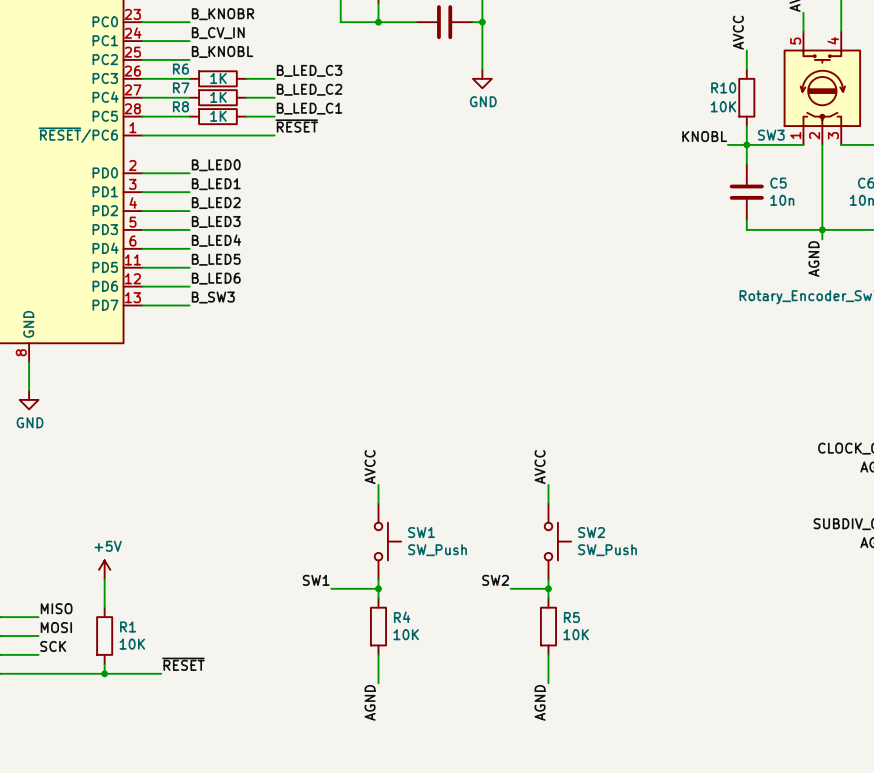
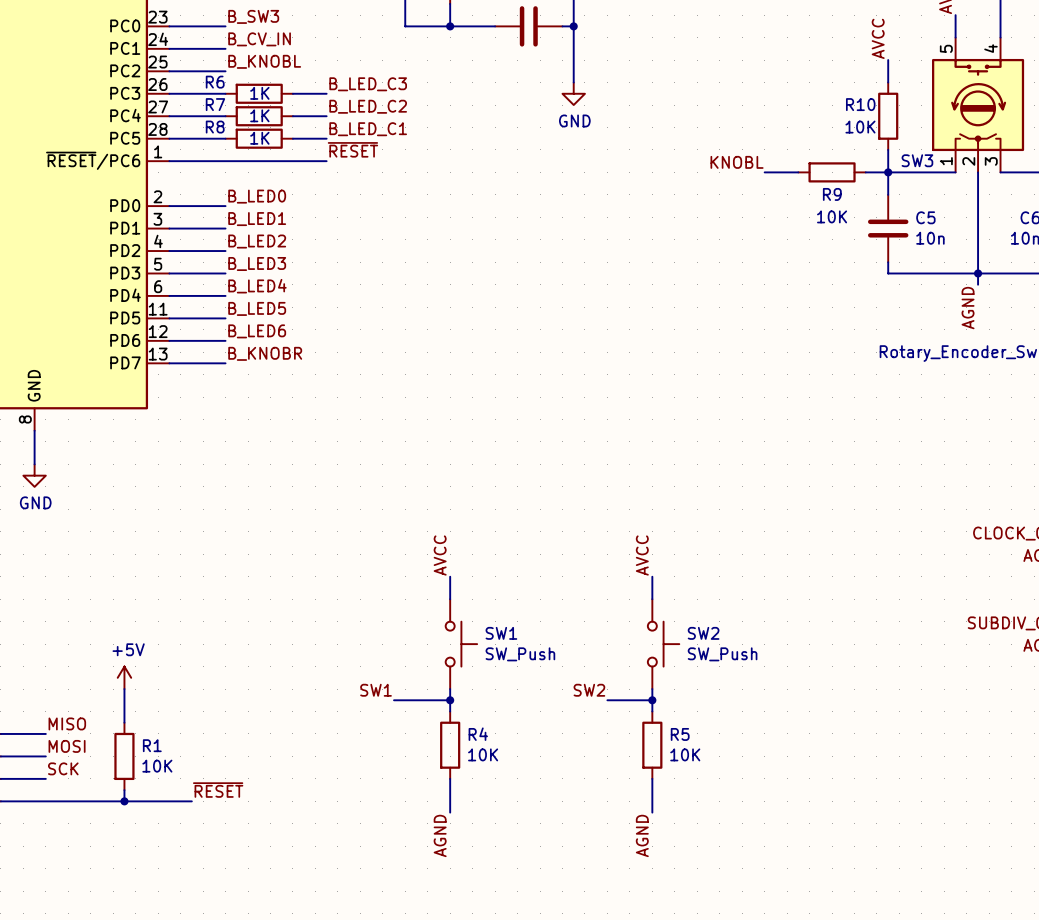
label: B_KNOBR (222, 14) -> B_SW3 (253, 16)
label position: KNOBL (704, 136) -> KNOBL (737, 162)
wire: none -> (764, 172) (798, 172)
R9: none -> 10K (832, 172)
label: B_SW3 (213, 297) -> B_KNOBR (265, 353)

